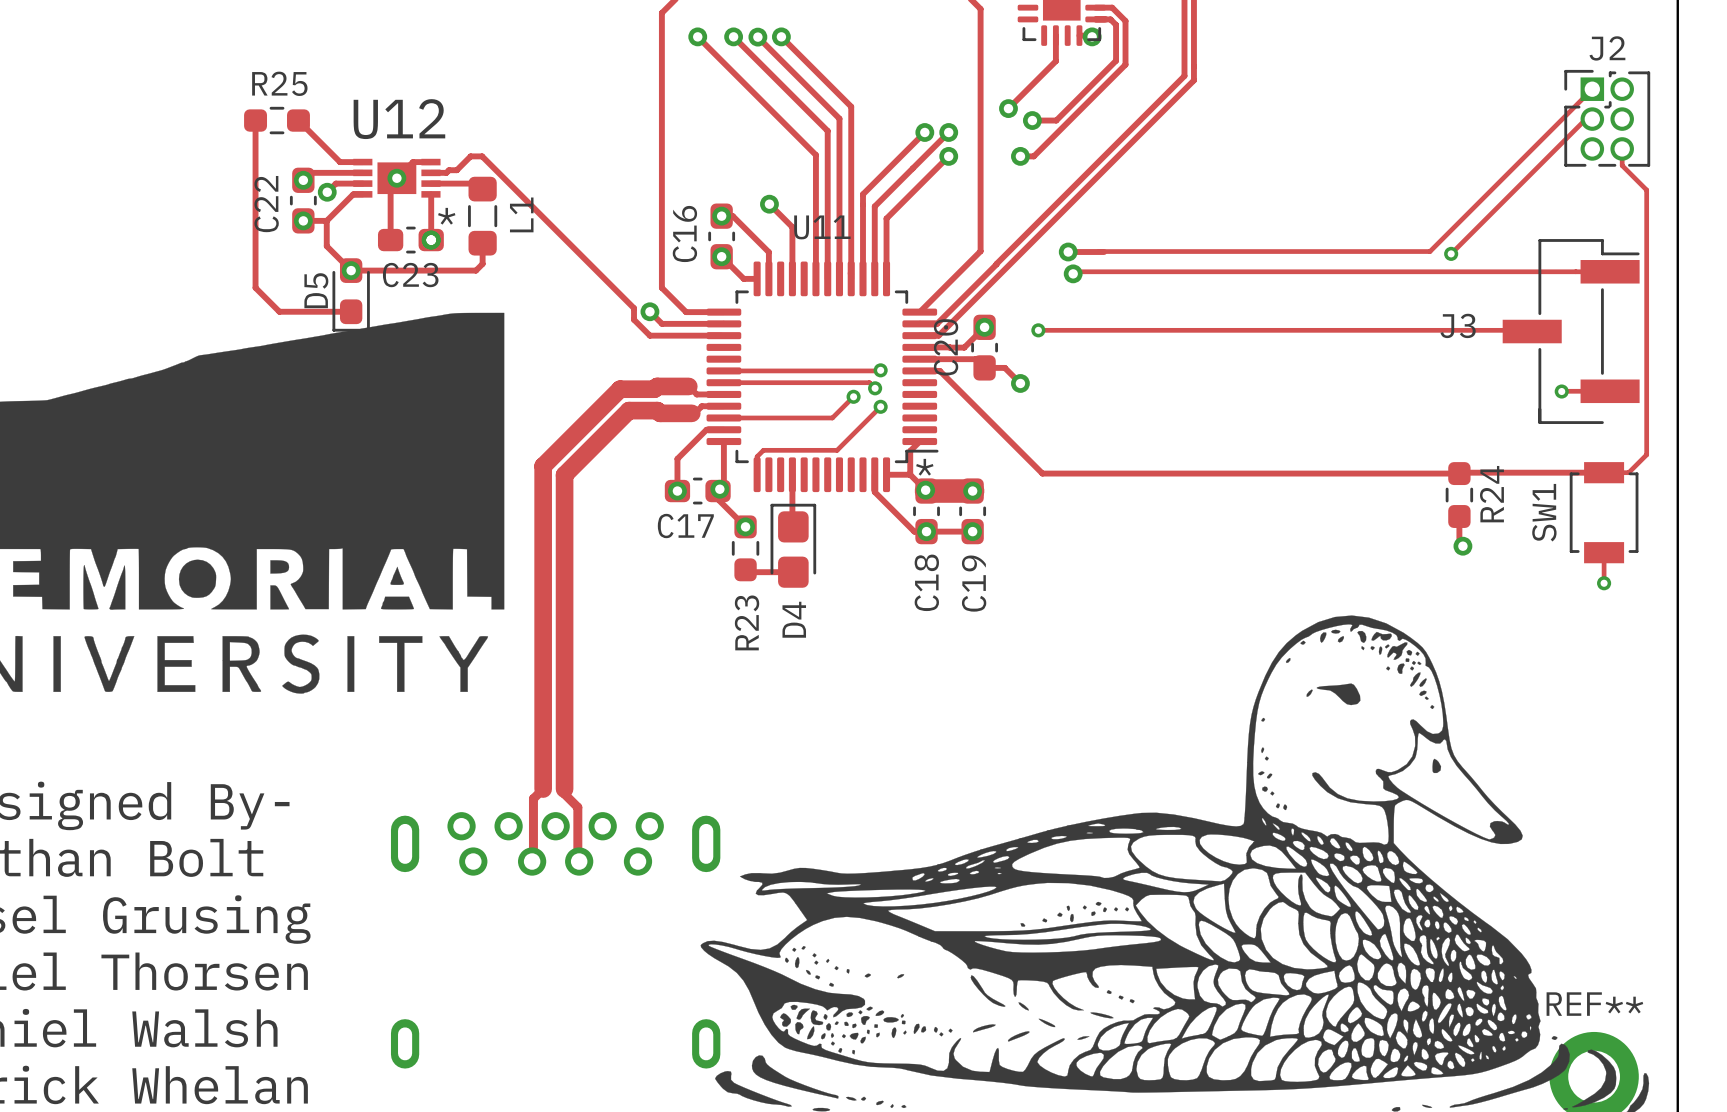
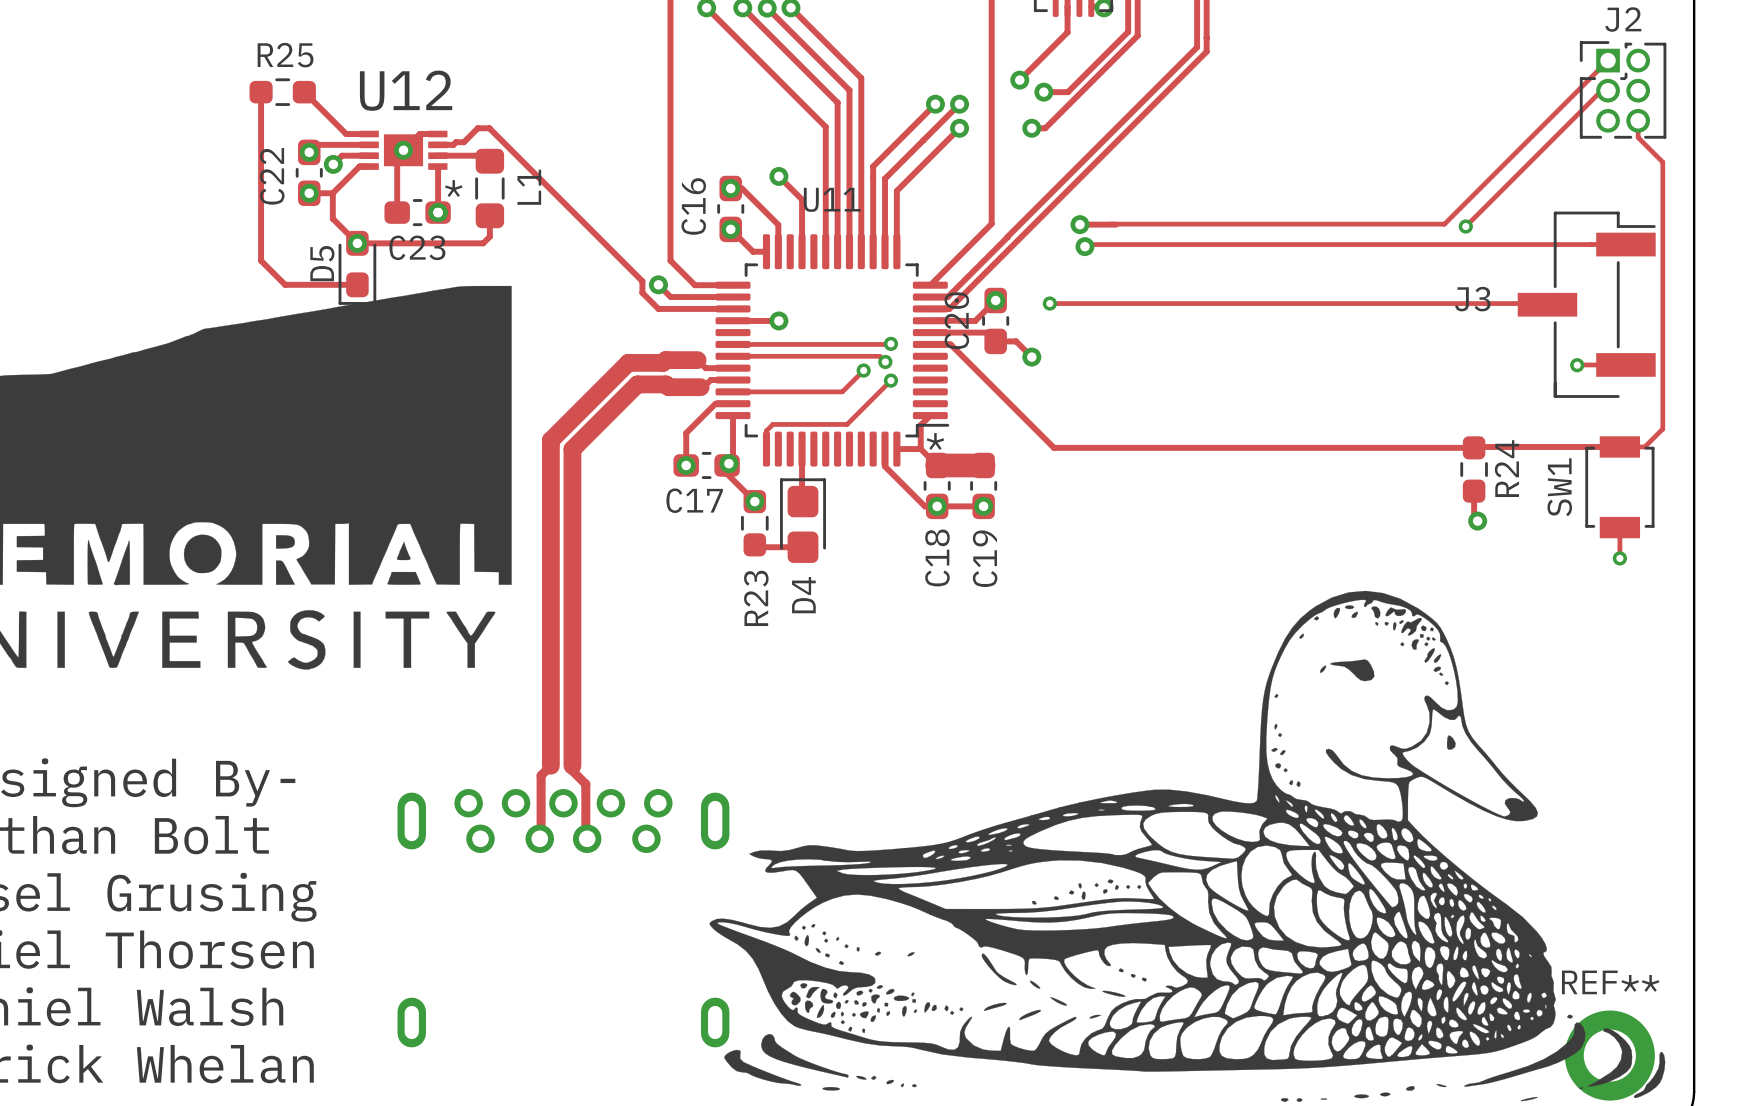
track: none -> (733, 320) (778, 320)
via: none -> (778, 320)
via: (925, 490) -> none
via: (972, 491) -> none

